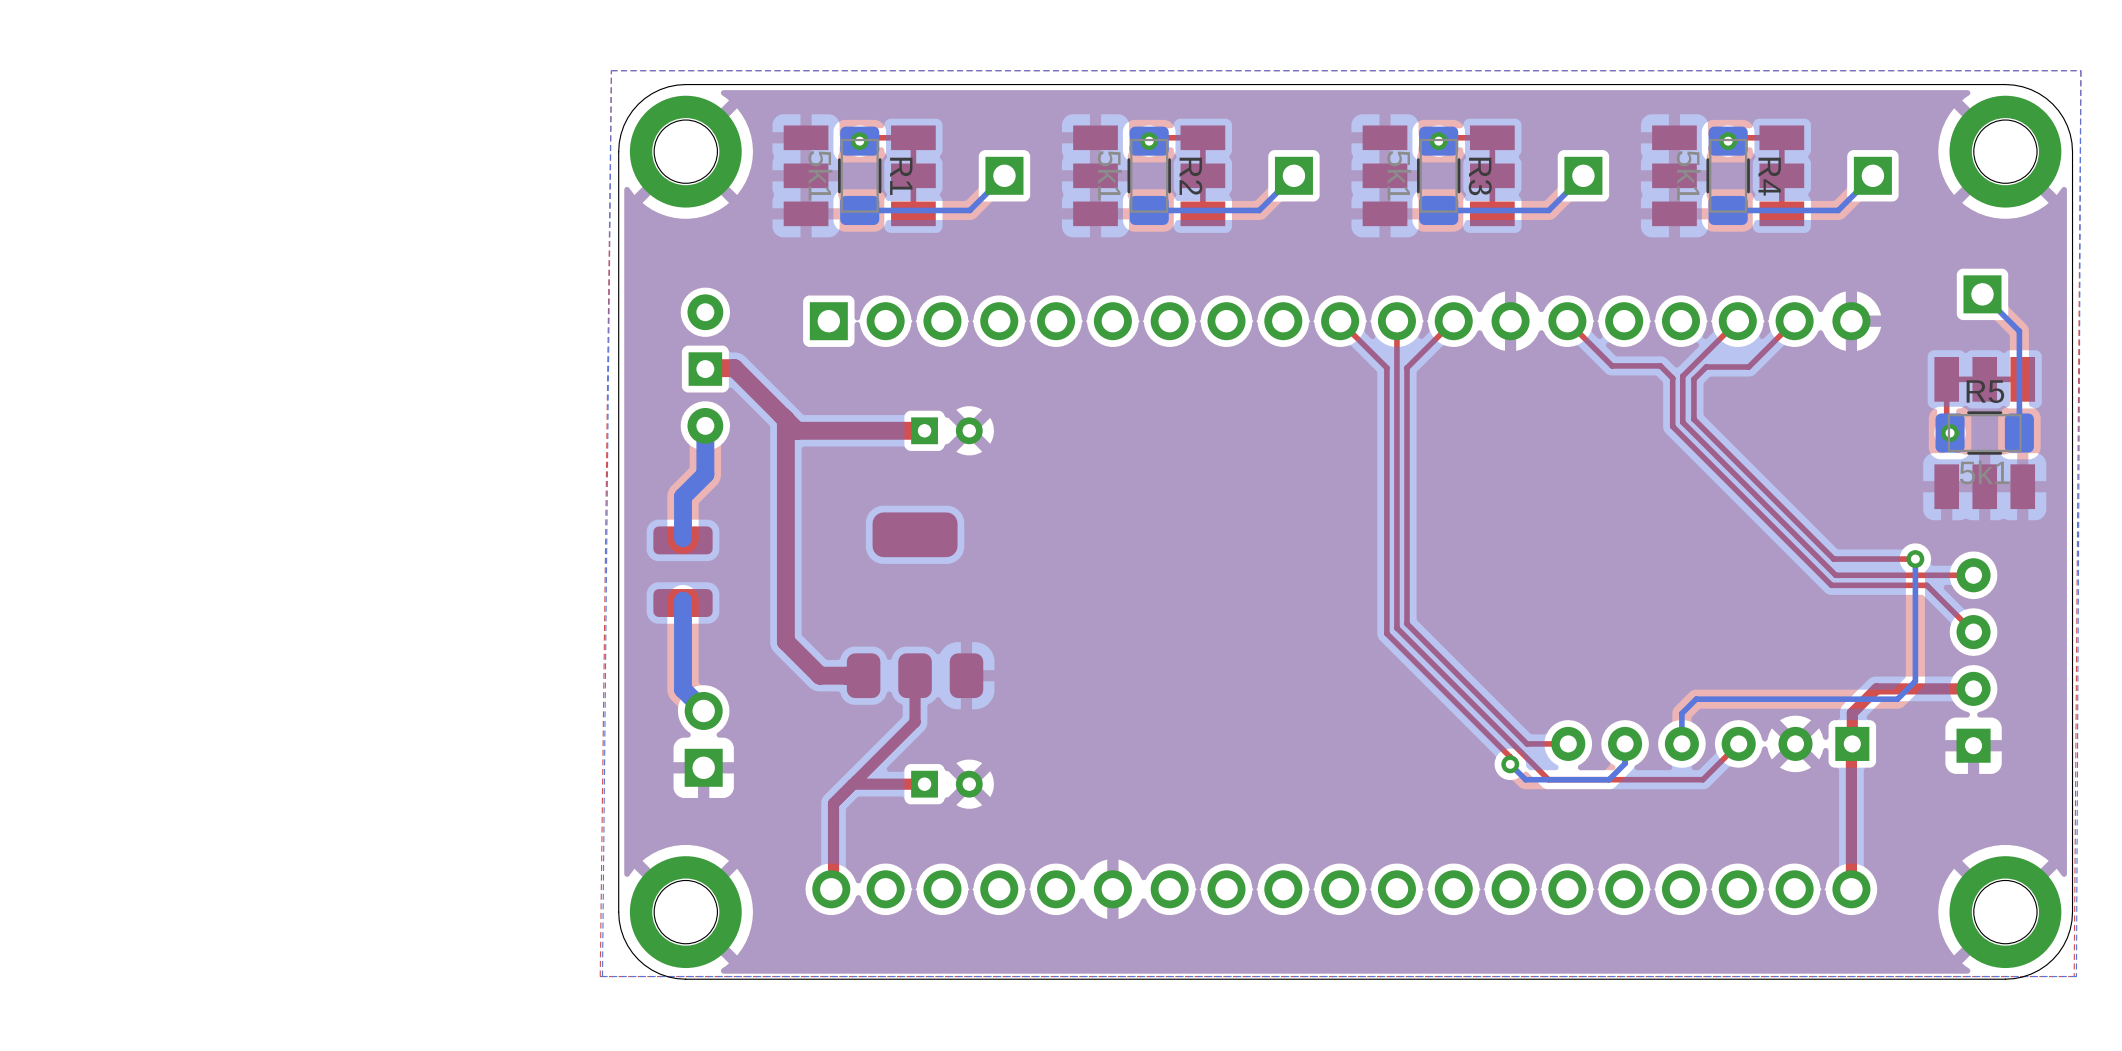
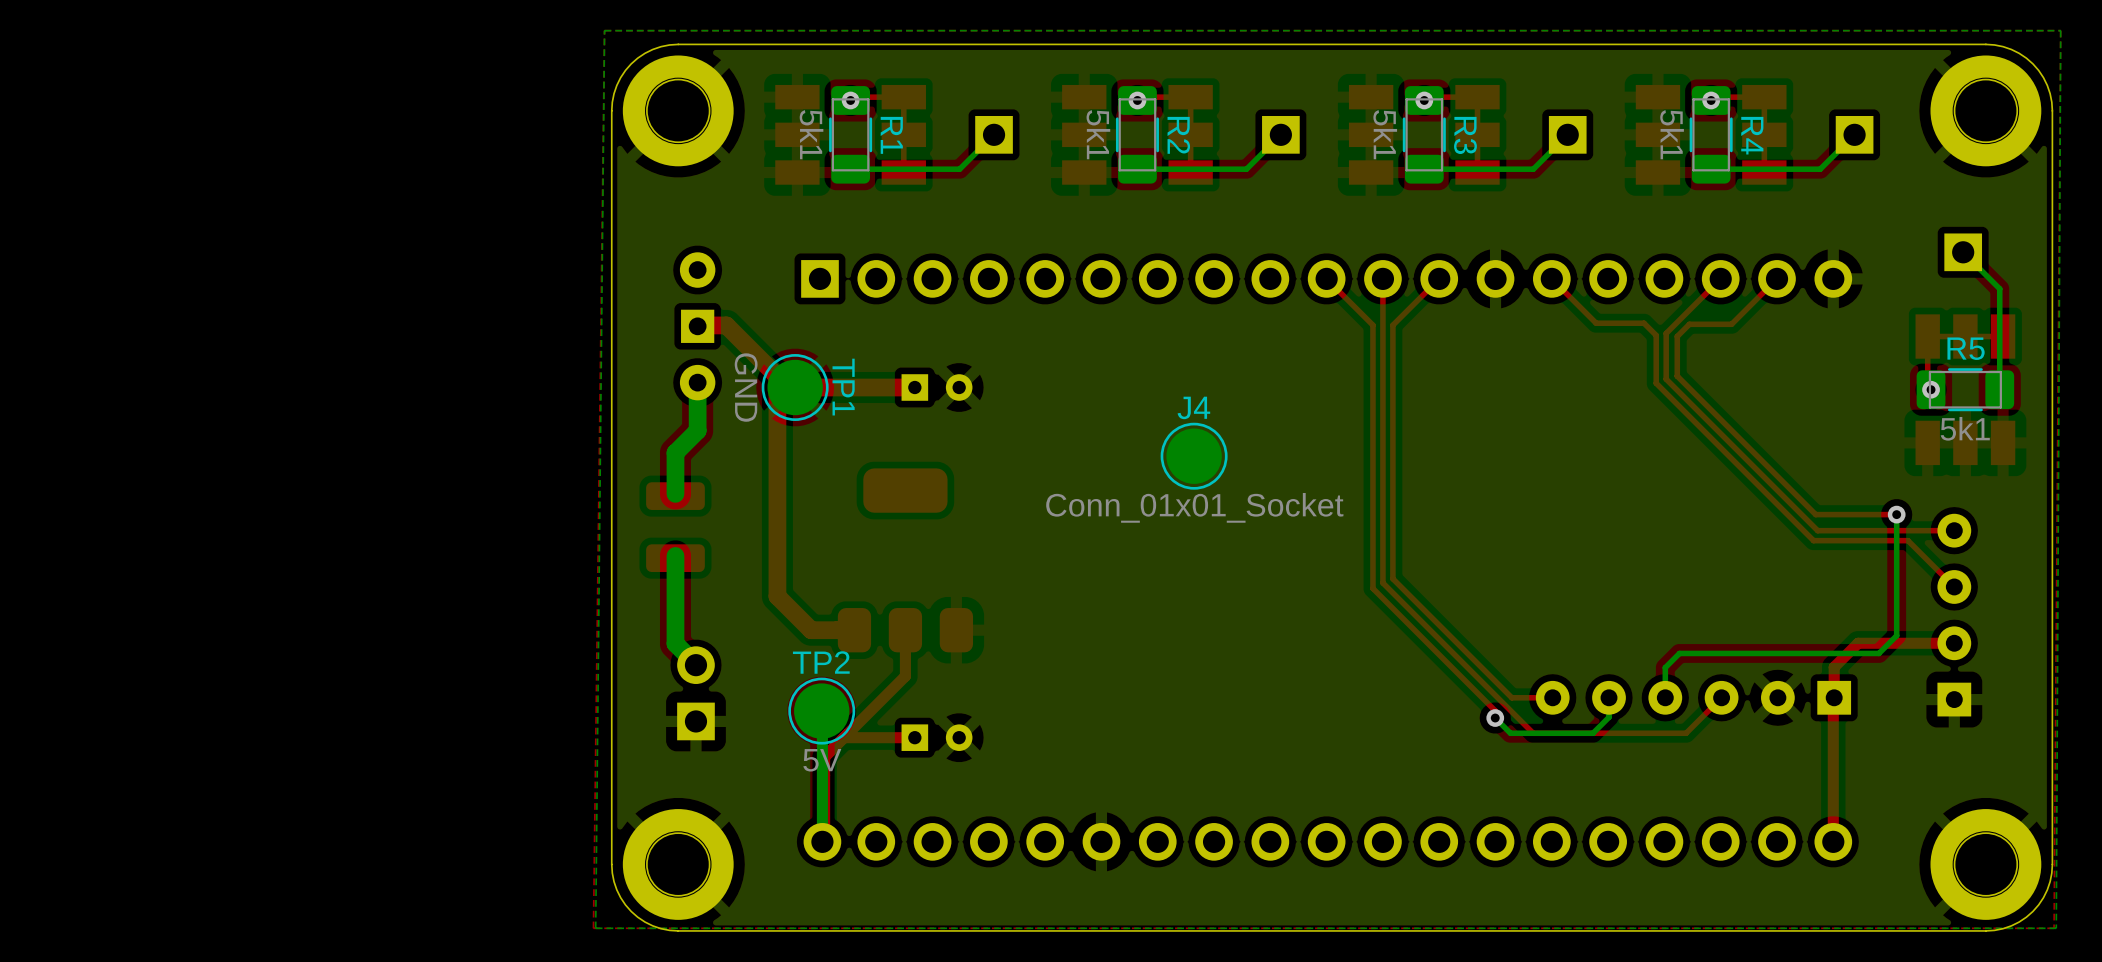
TP1: none -> GND (795, 387)
J4: none -> Conn_01x01_Socket (1194, 456)
bottom track: none -> (821, 711) (822, 841)
TP2: none -> 5V (821, 711)

